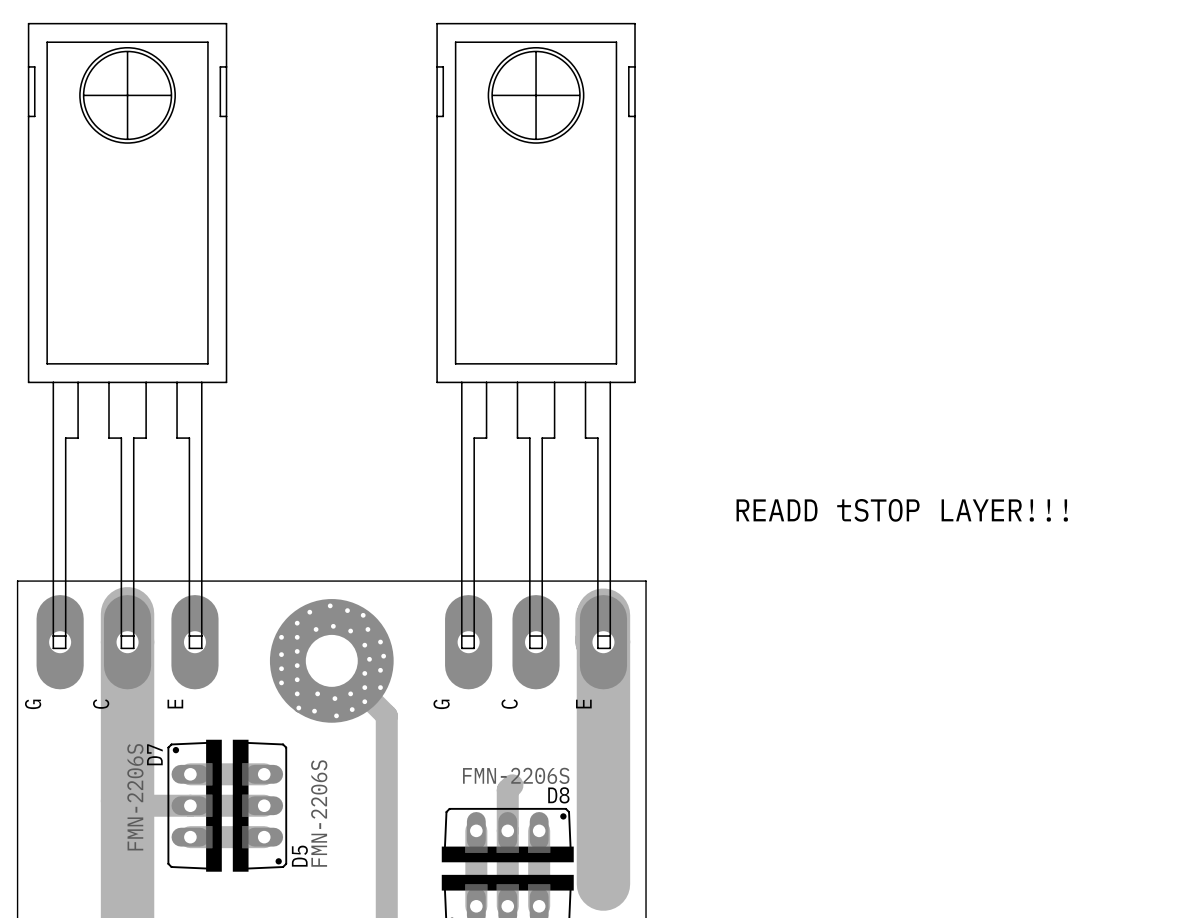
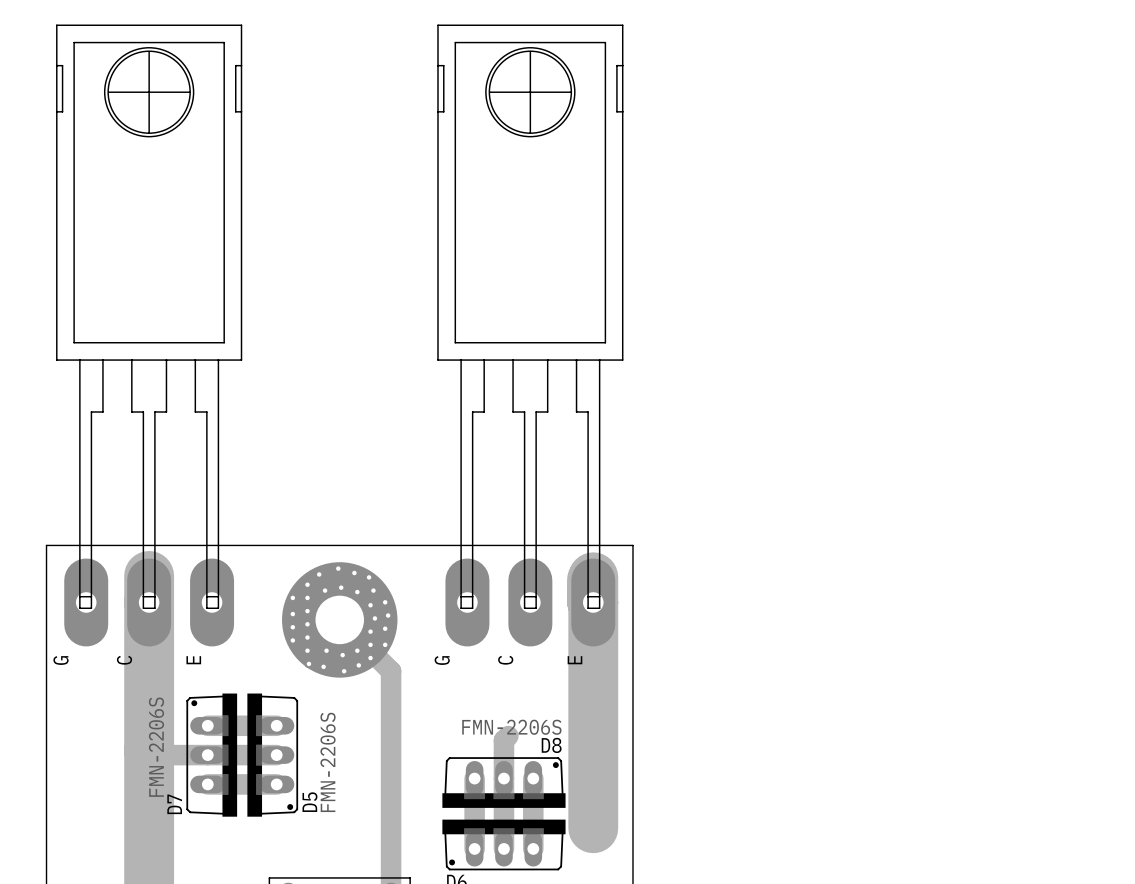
text: READD tSTOP LAYER!!! (902, 510) -> none
D7 name position: D7 (154, 754) -> D7 (174, 804)

